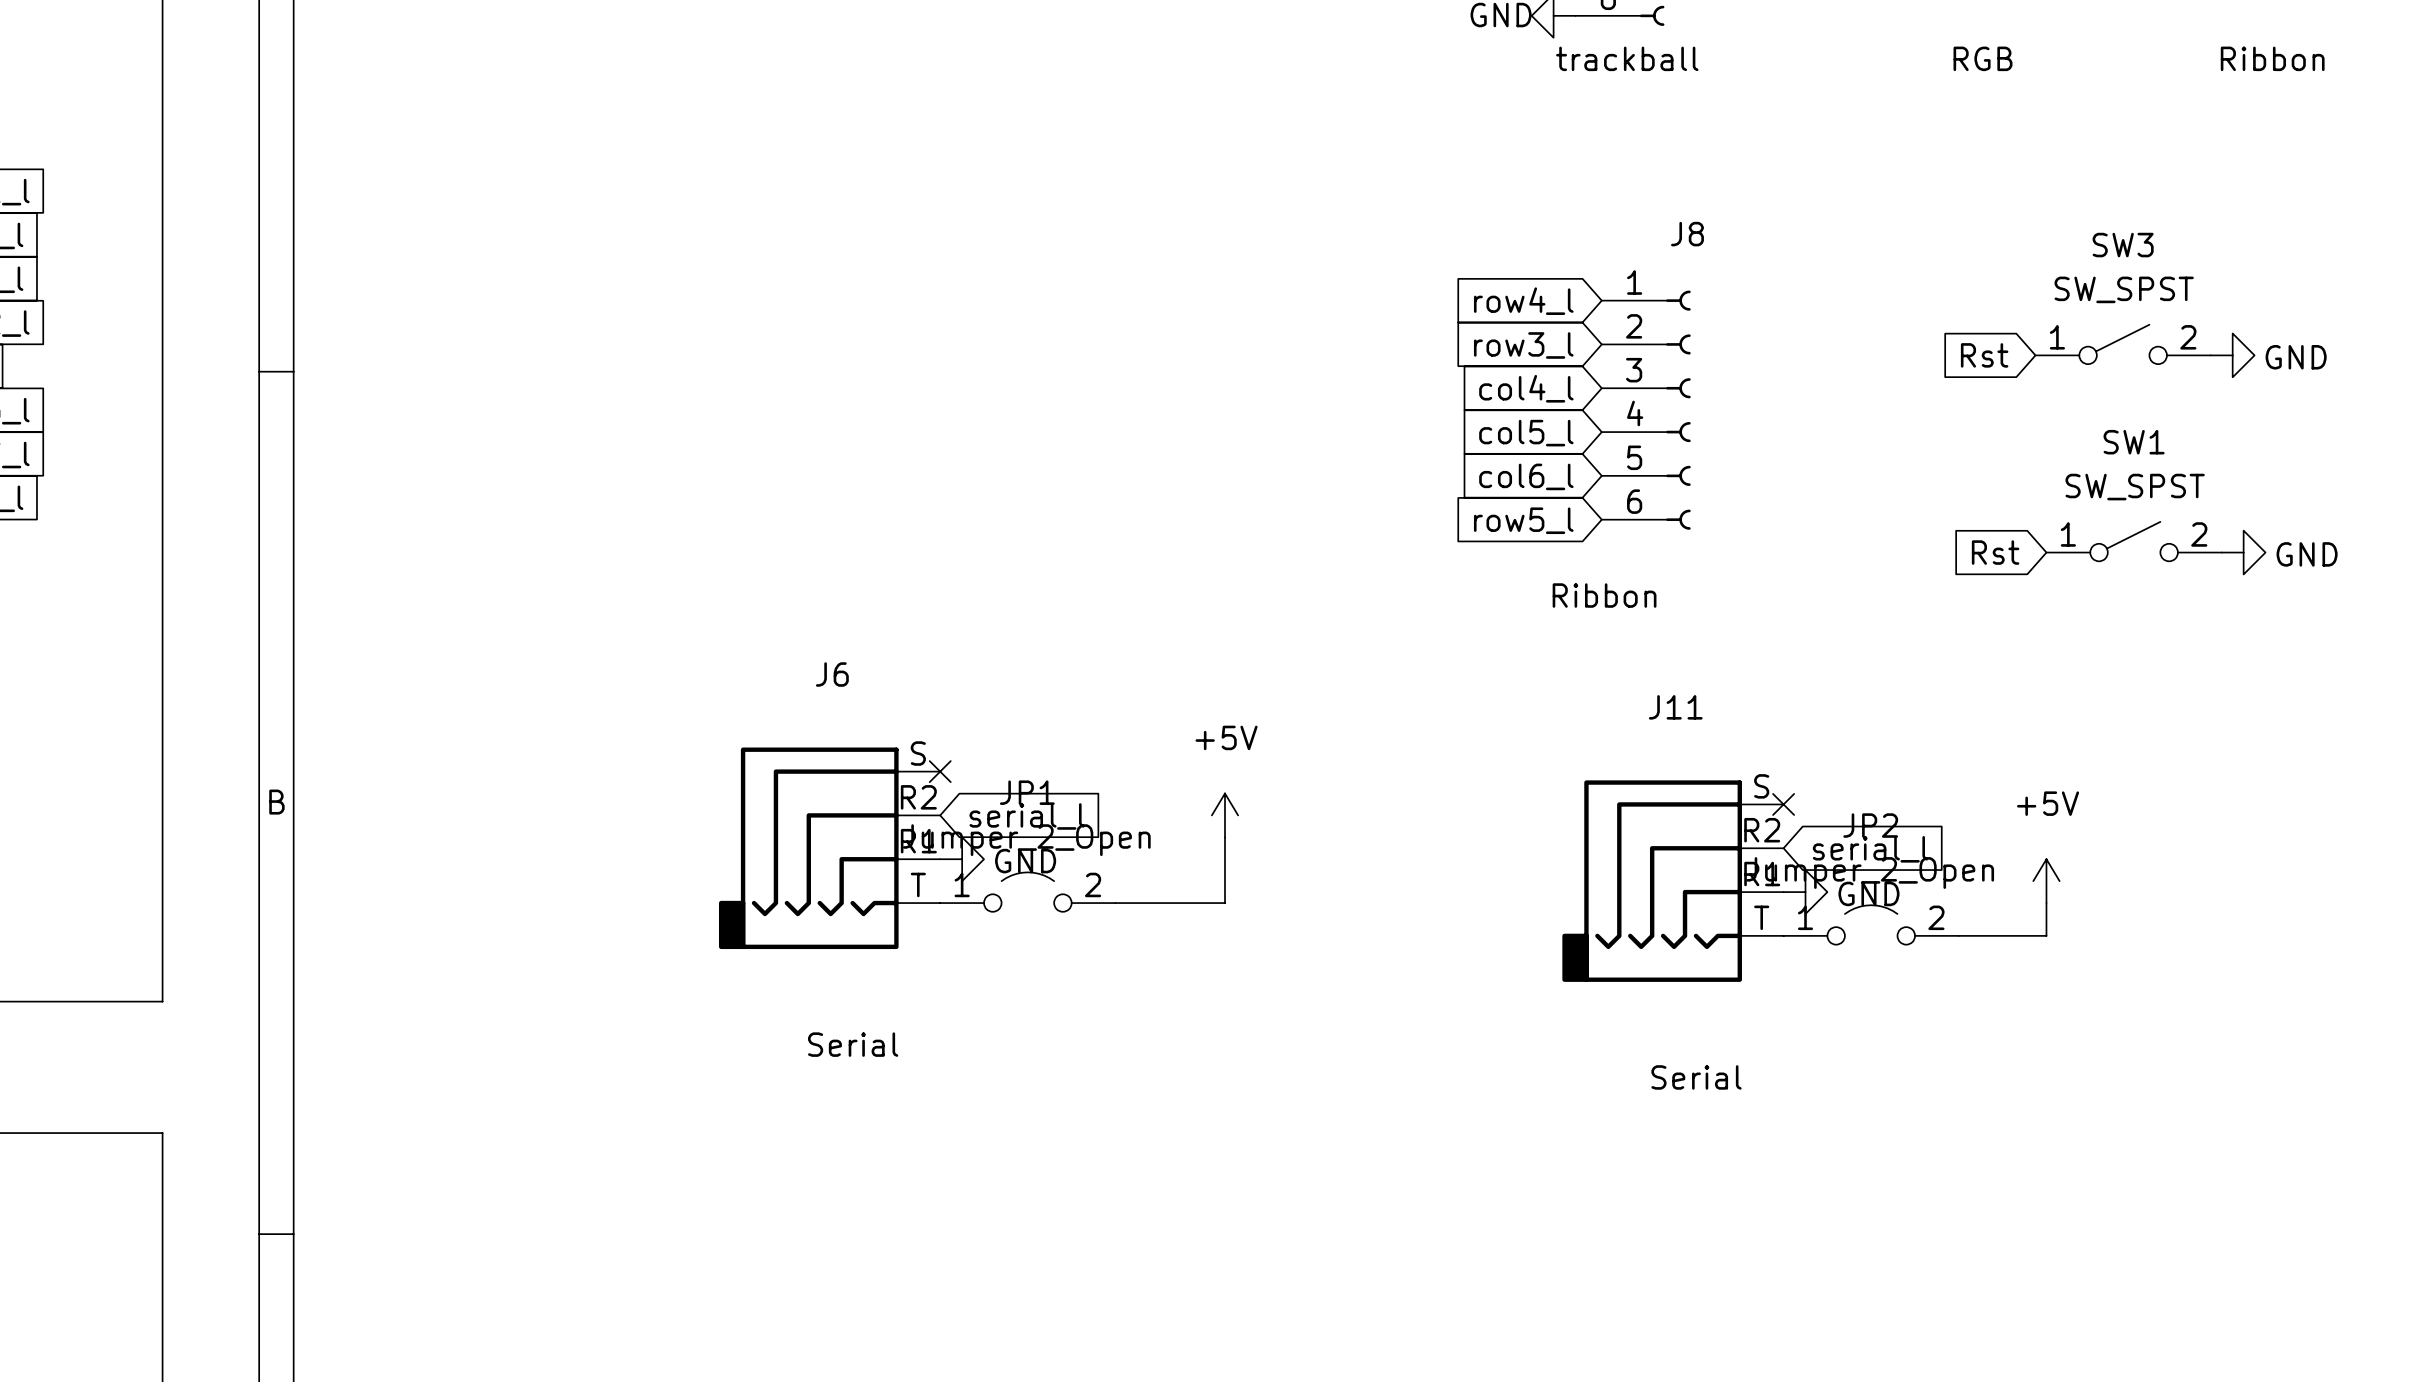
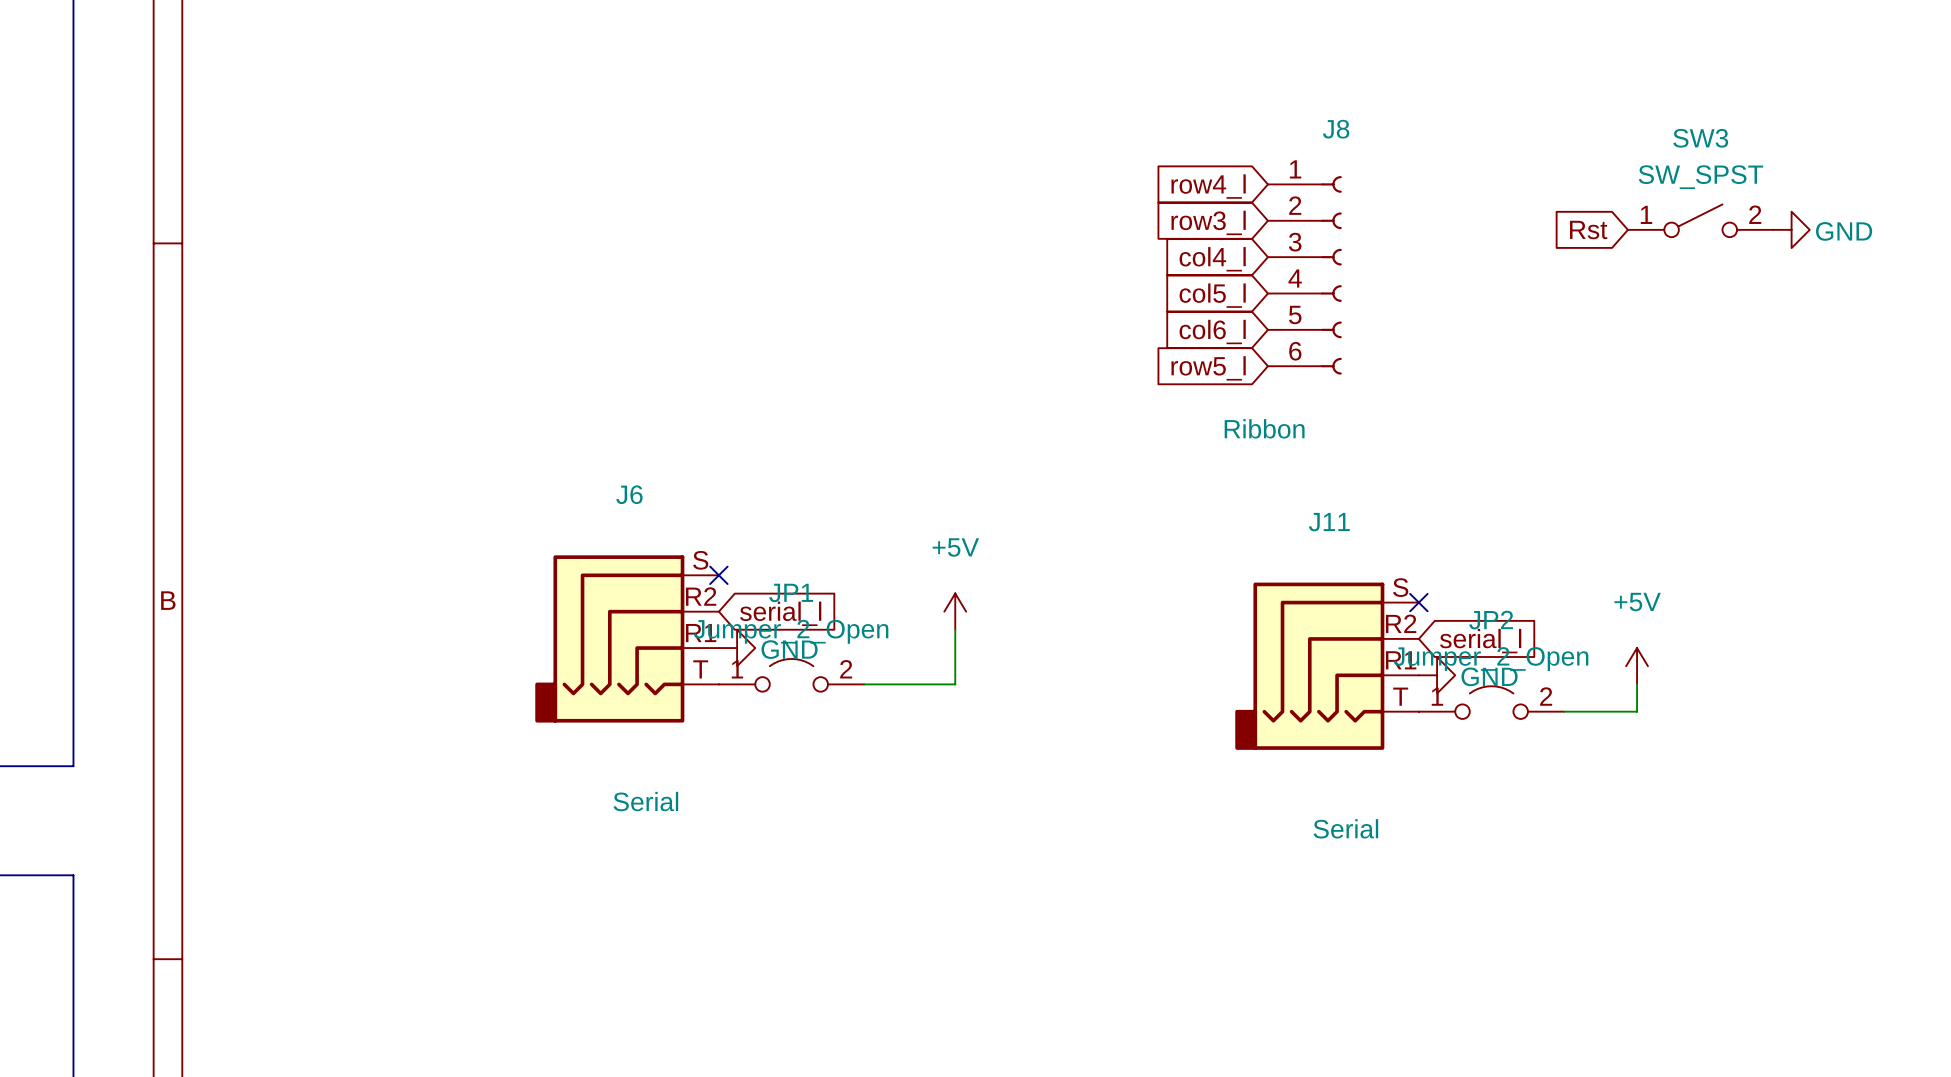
SW1: SW_SPST (2134, 541) -> none
global label: Rst (1995, 552) -> none
power symbol: GND (2243, 552) -> none

